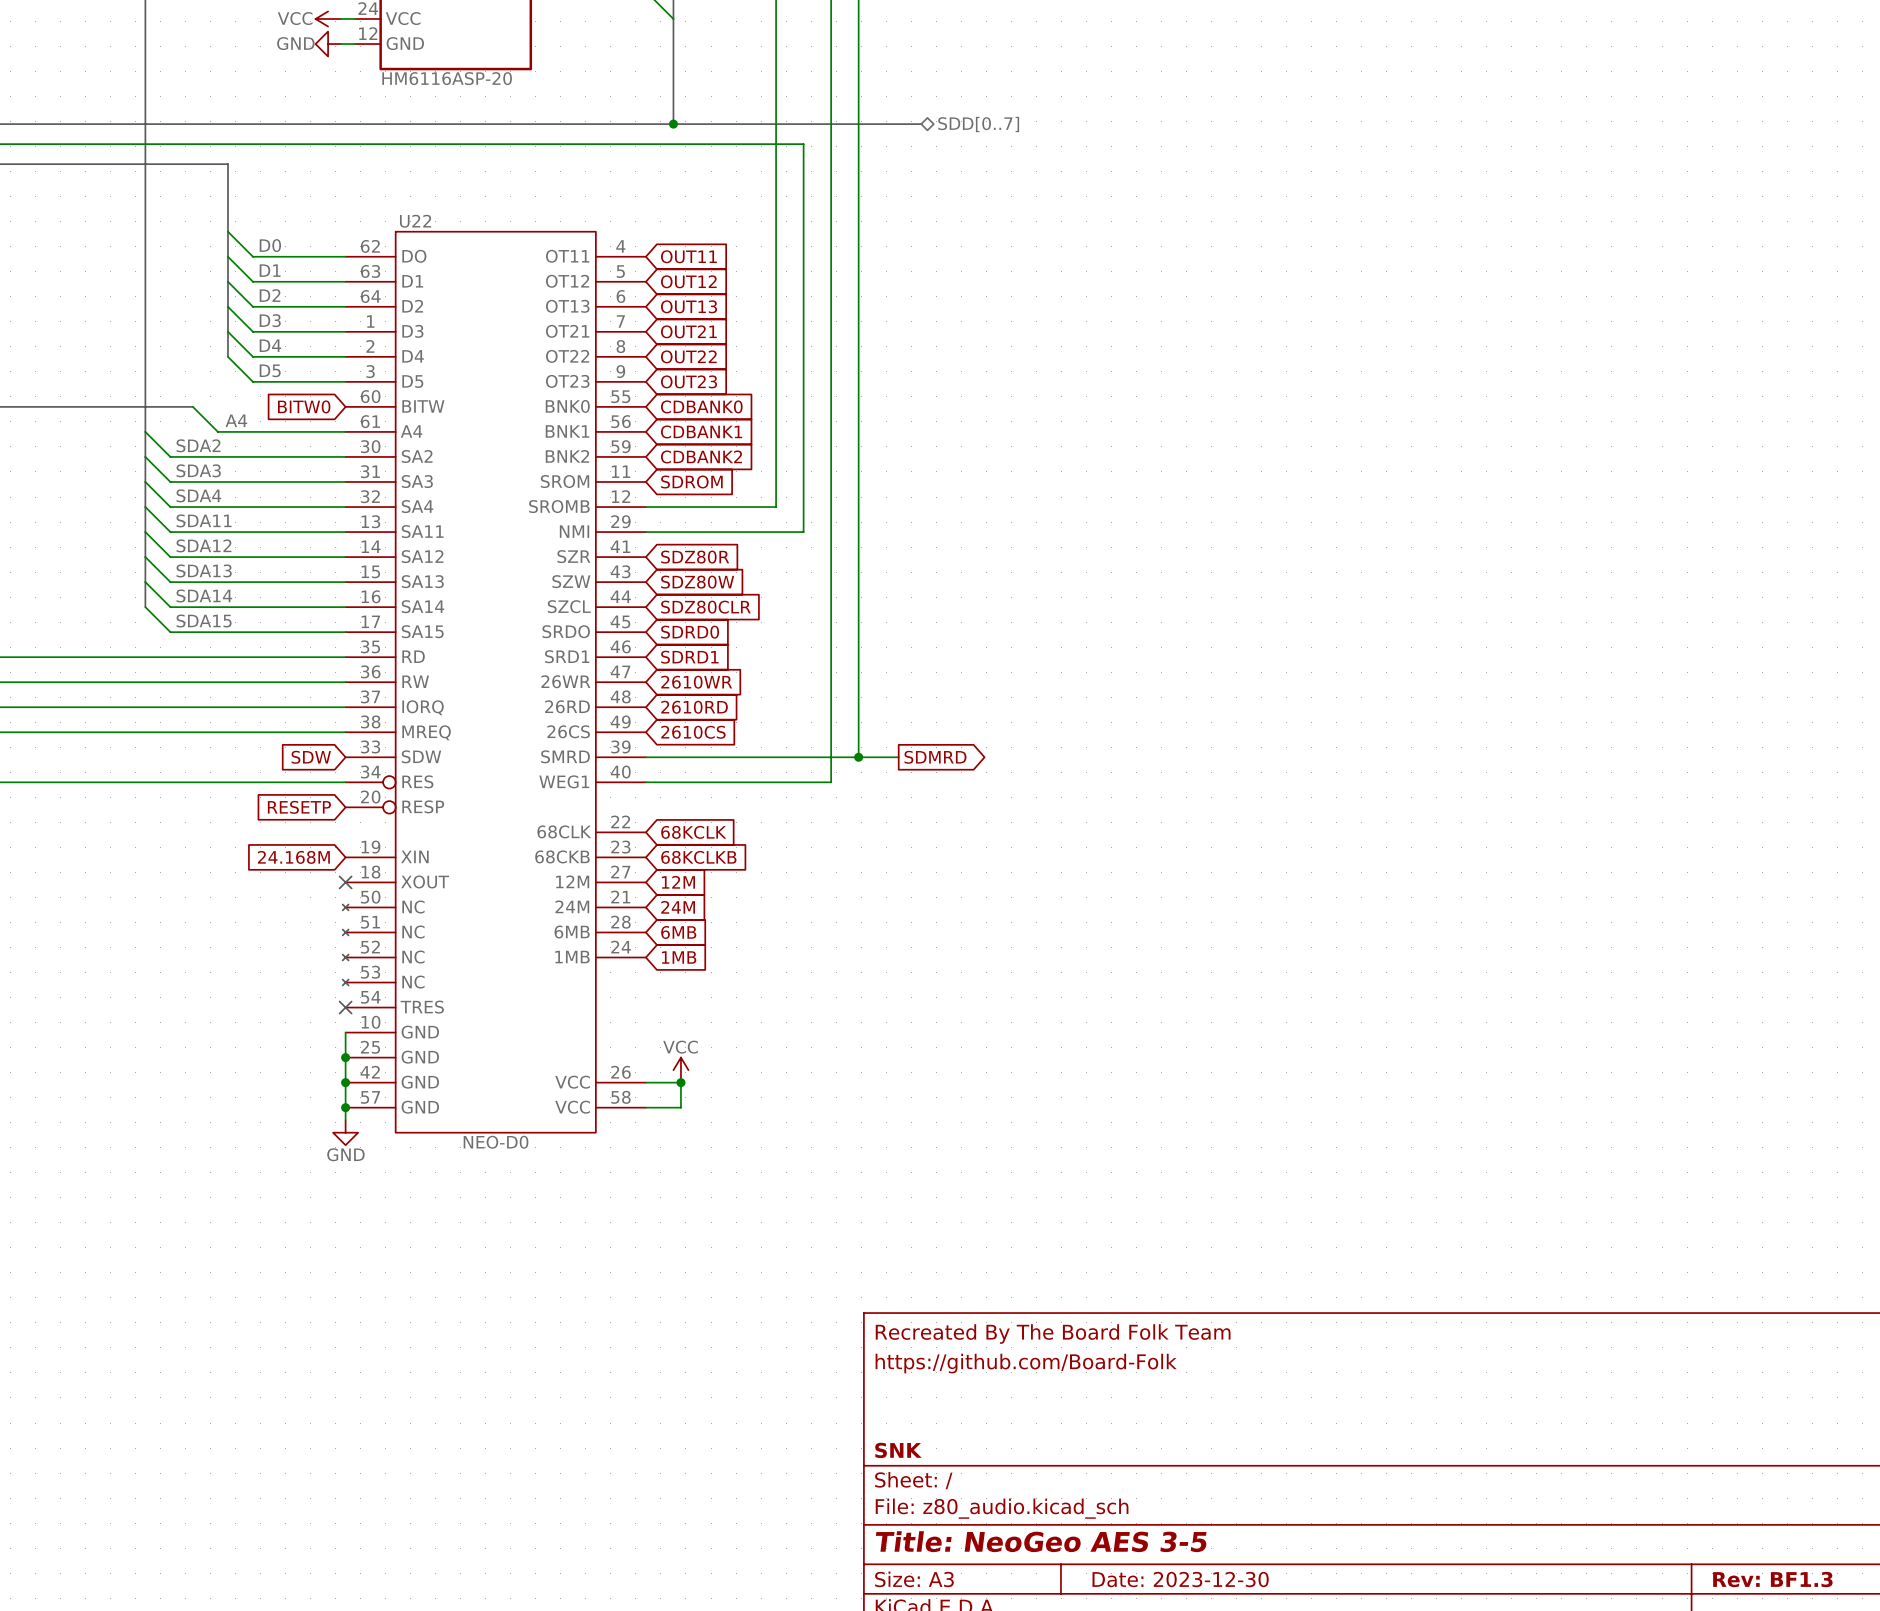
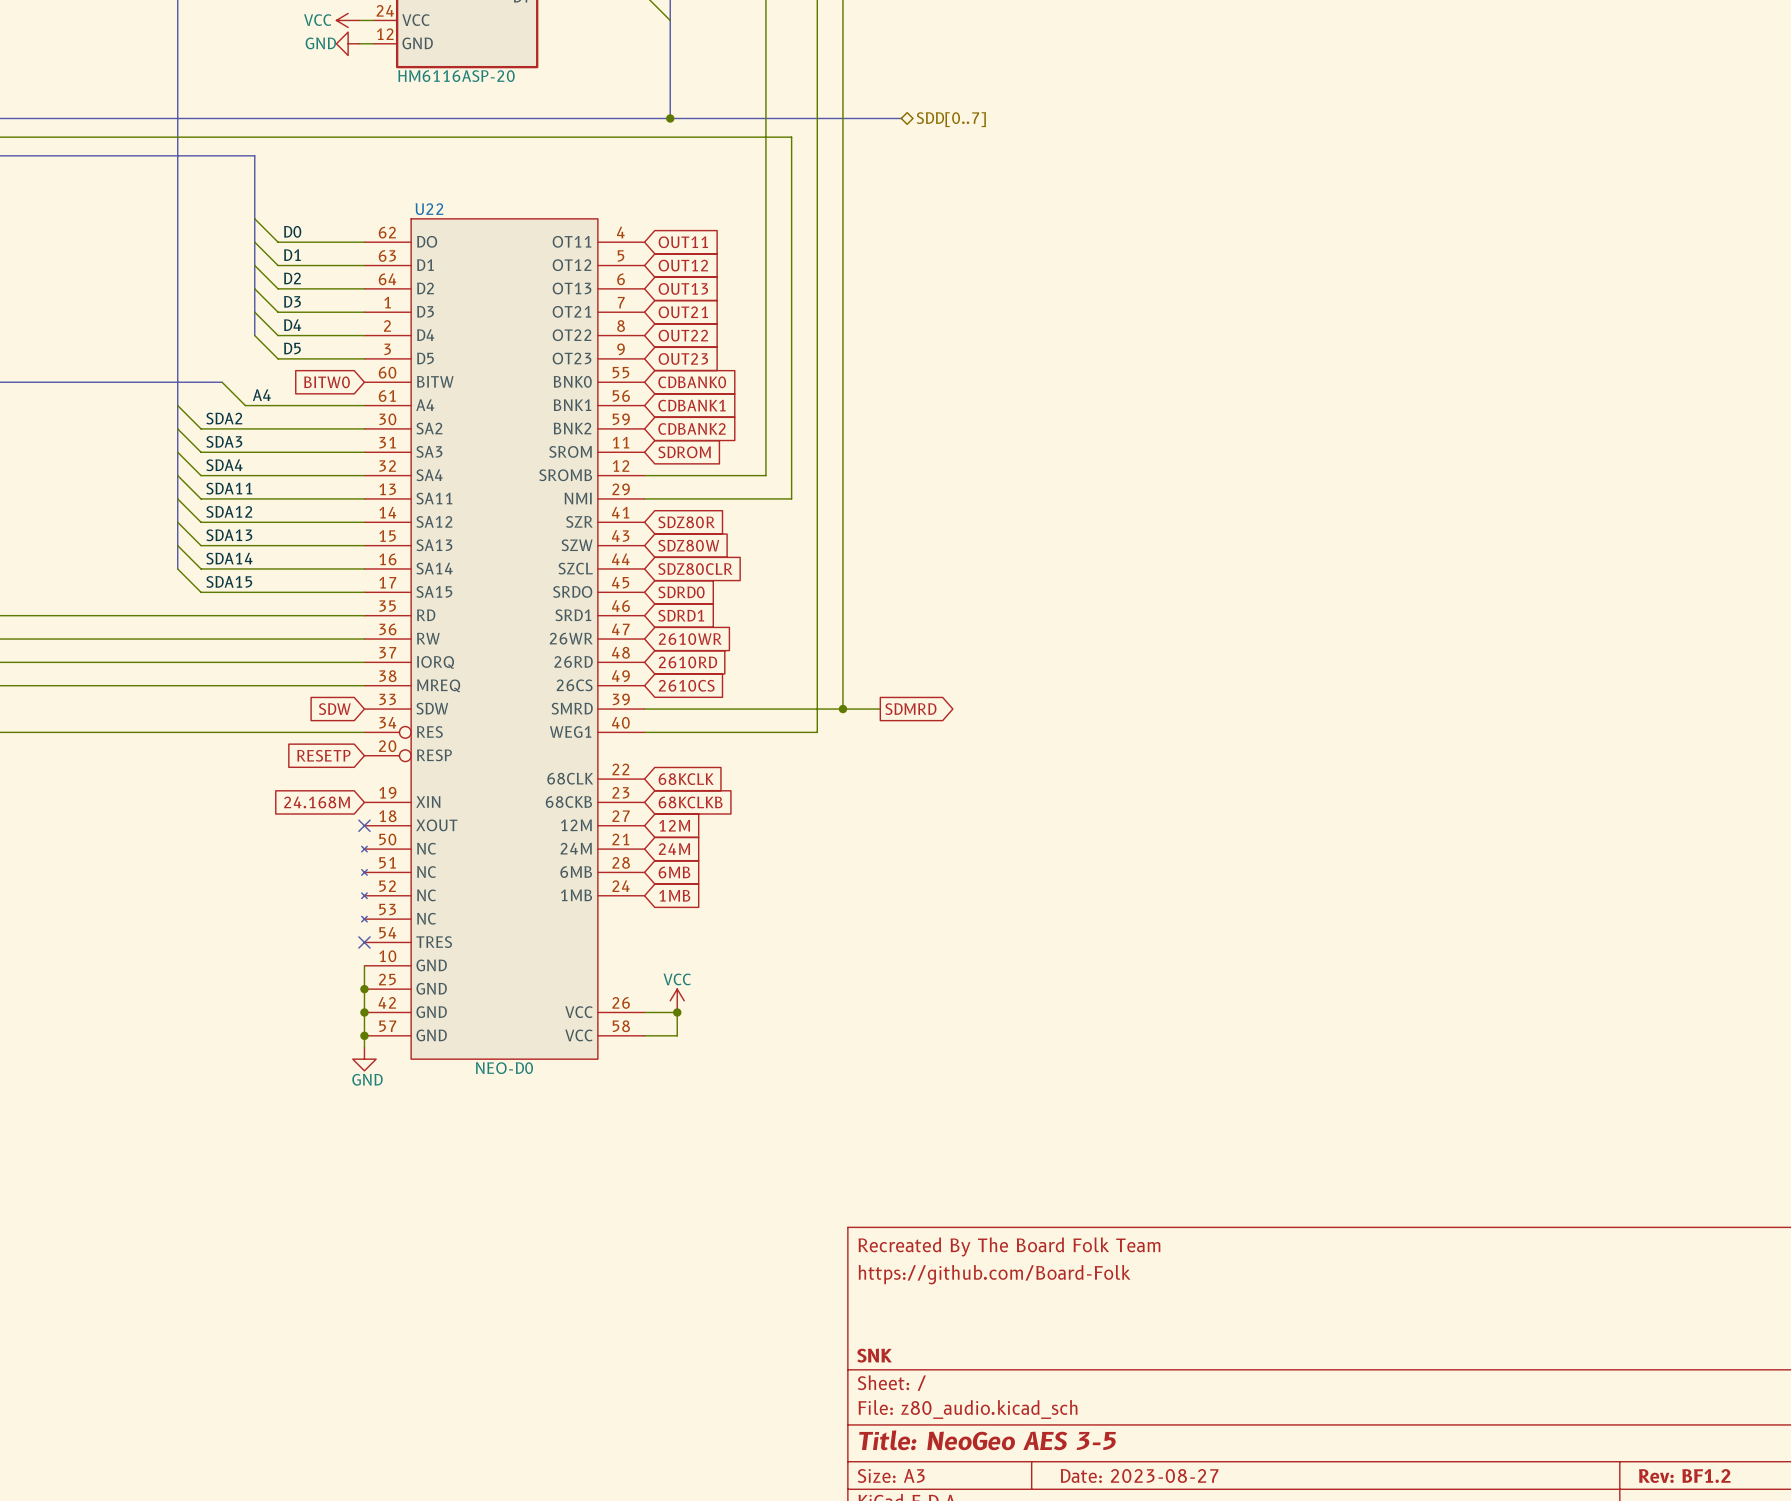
title block: Date: 2023-12-30 (1180, 1579) -> Date: 2023-08-27 (1139, 1475)
title block: Rev: BF1.3 (1772, 1579) -> Rev: BF1.2 (1684, 1476)

